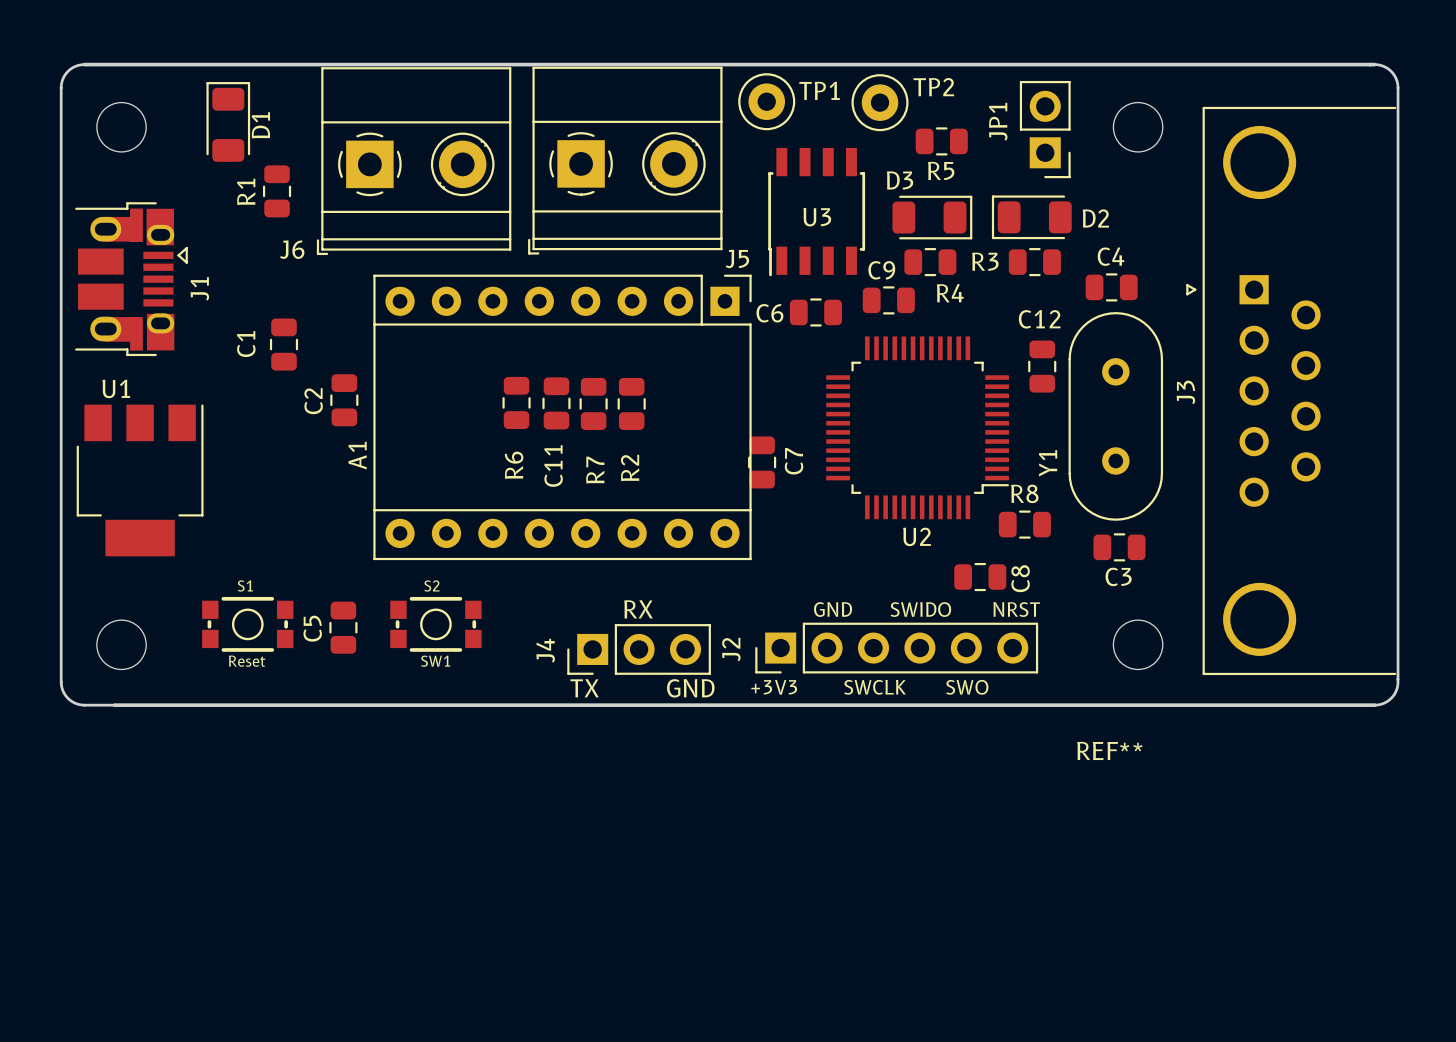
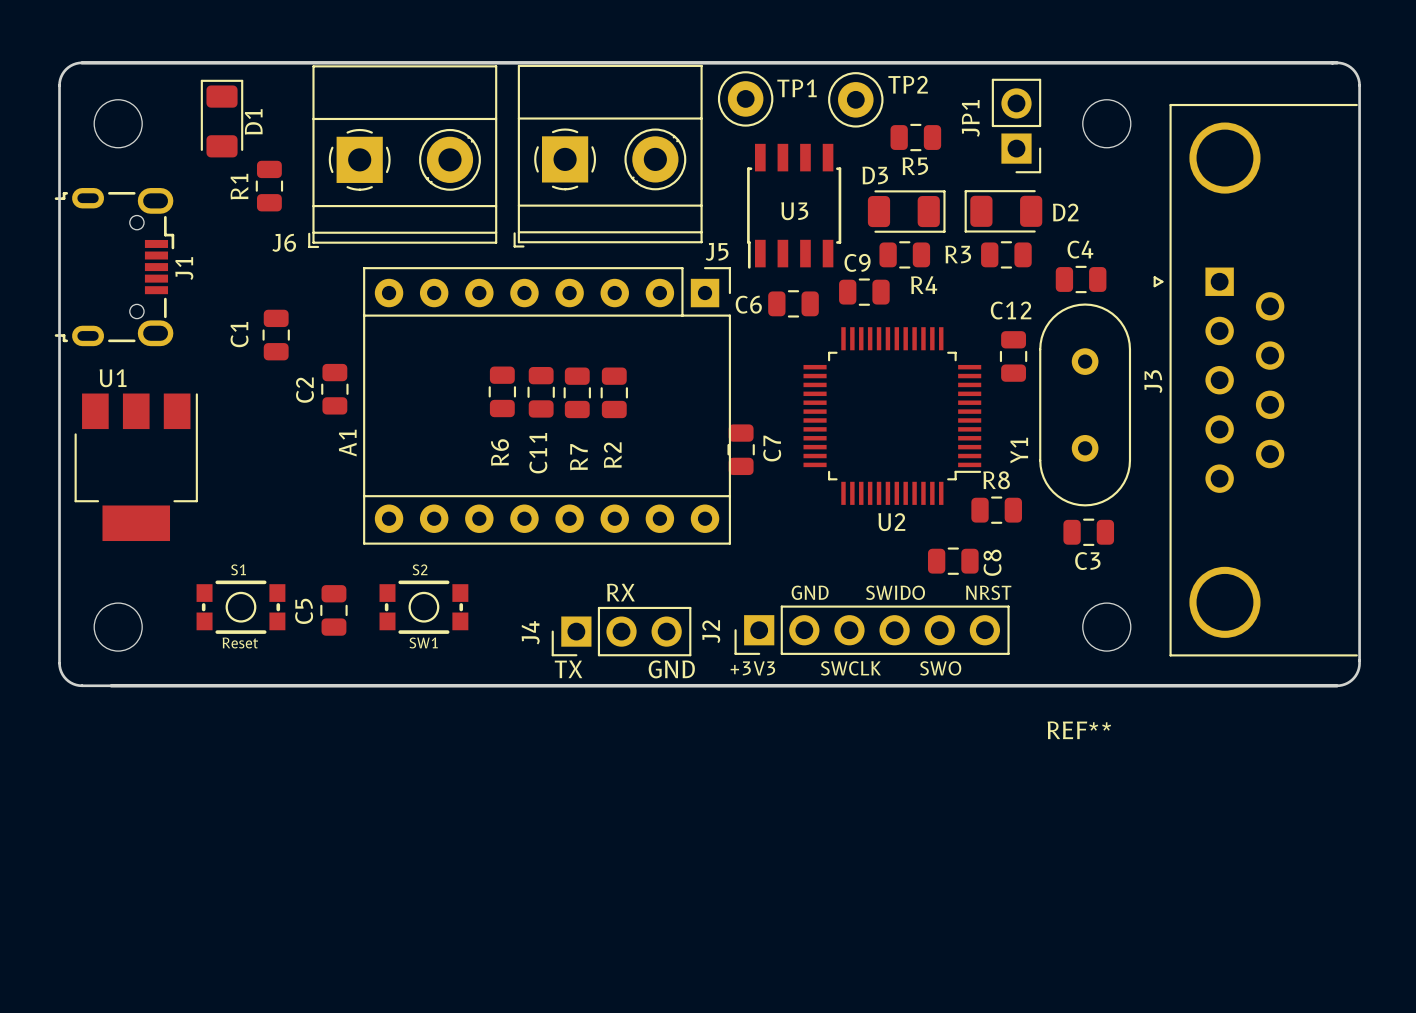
J1 footprint: [75, 202, 188, 357] -> [54, 187, 175, 347]

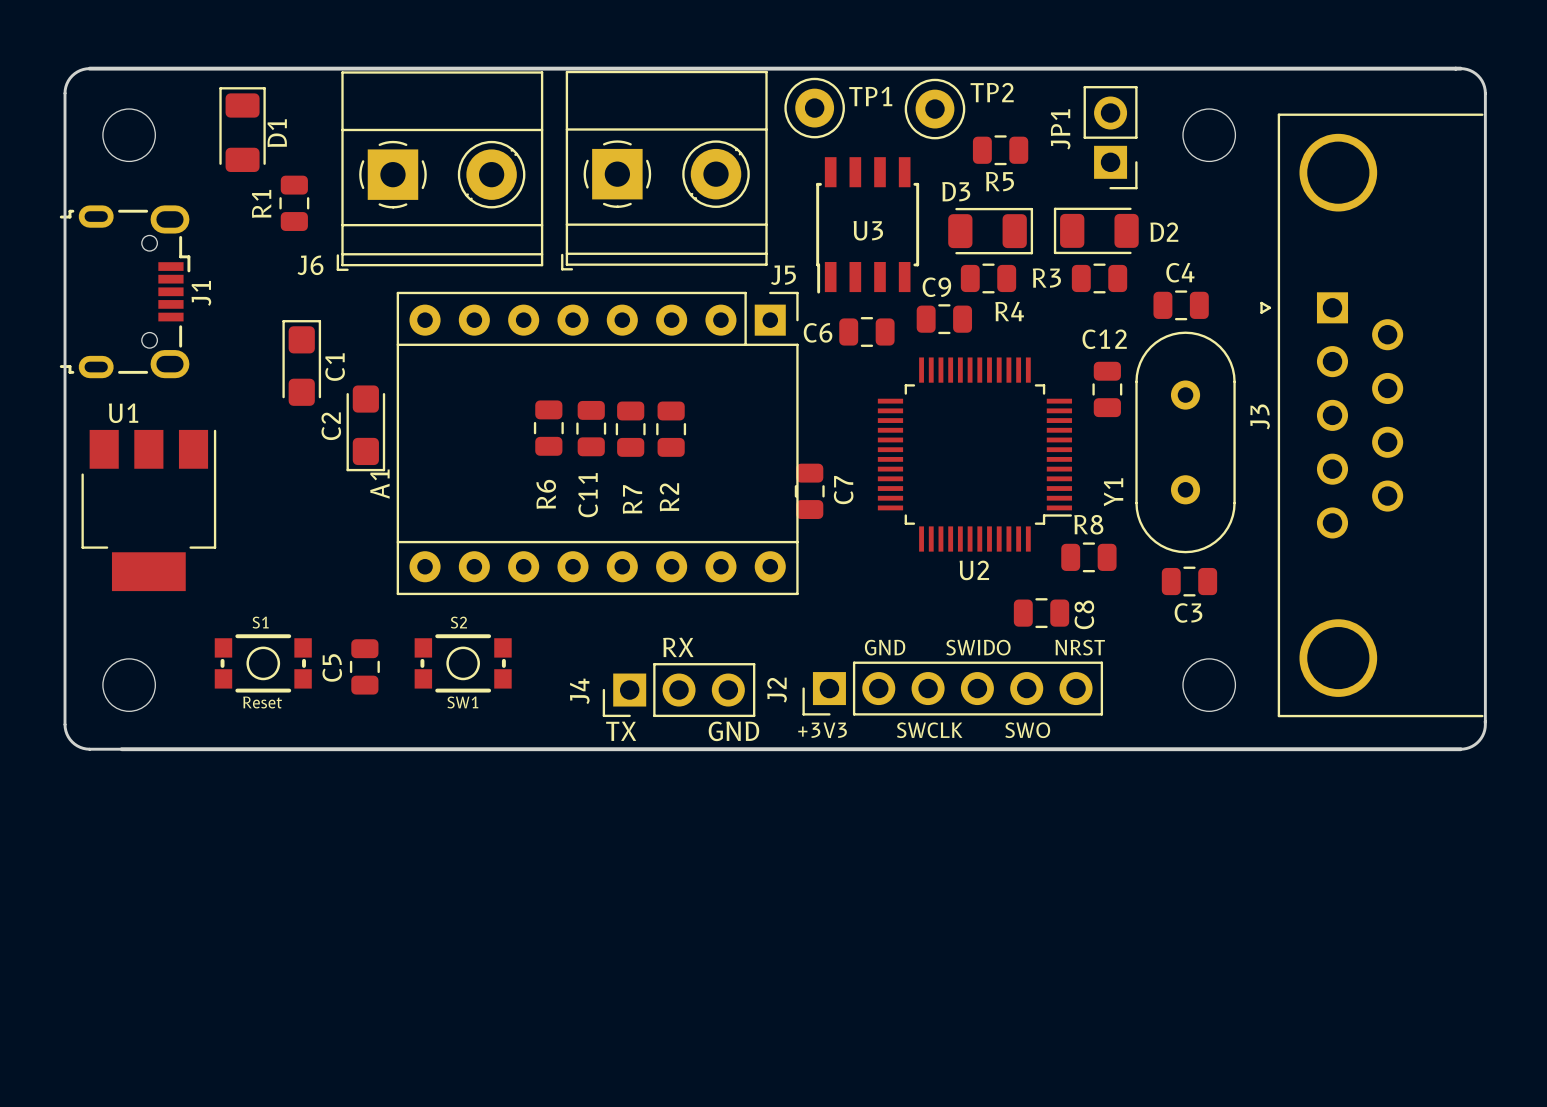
C1 footprint: [262, 309, 290, 361] -> [282, 320, 322, 406]
C1 name position: C1 (239, 334) -> C1 (335, 367)
C2 footprint: [321, 363, 349, 415] -> [346, 385, 386, 472]
REF** name: REF** (1079, 730) -> none

